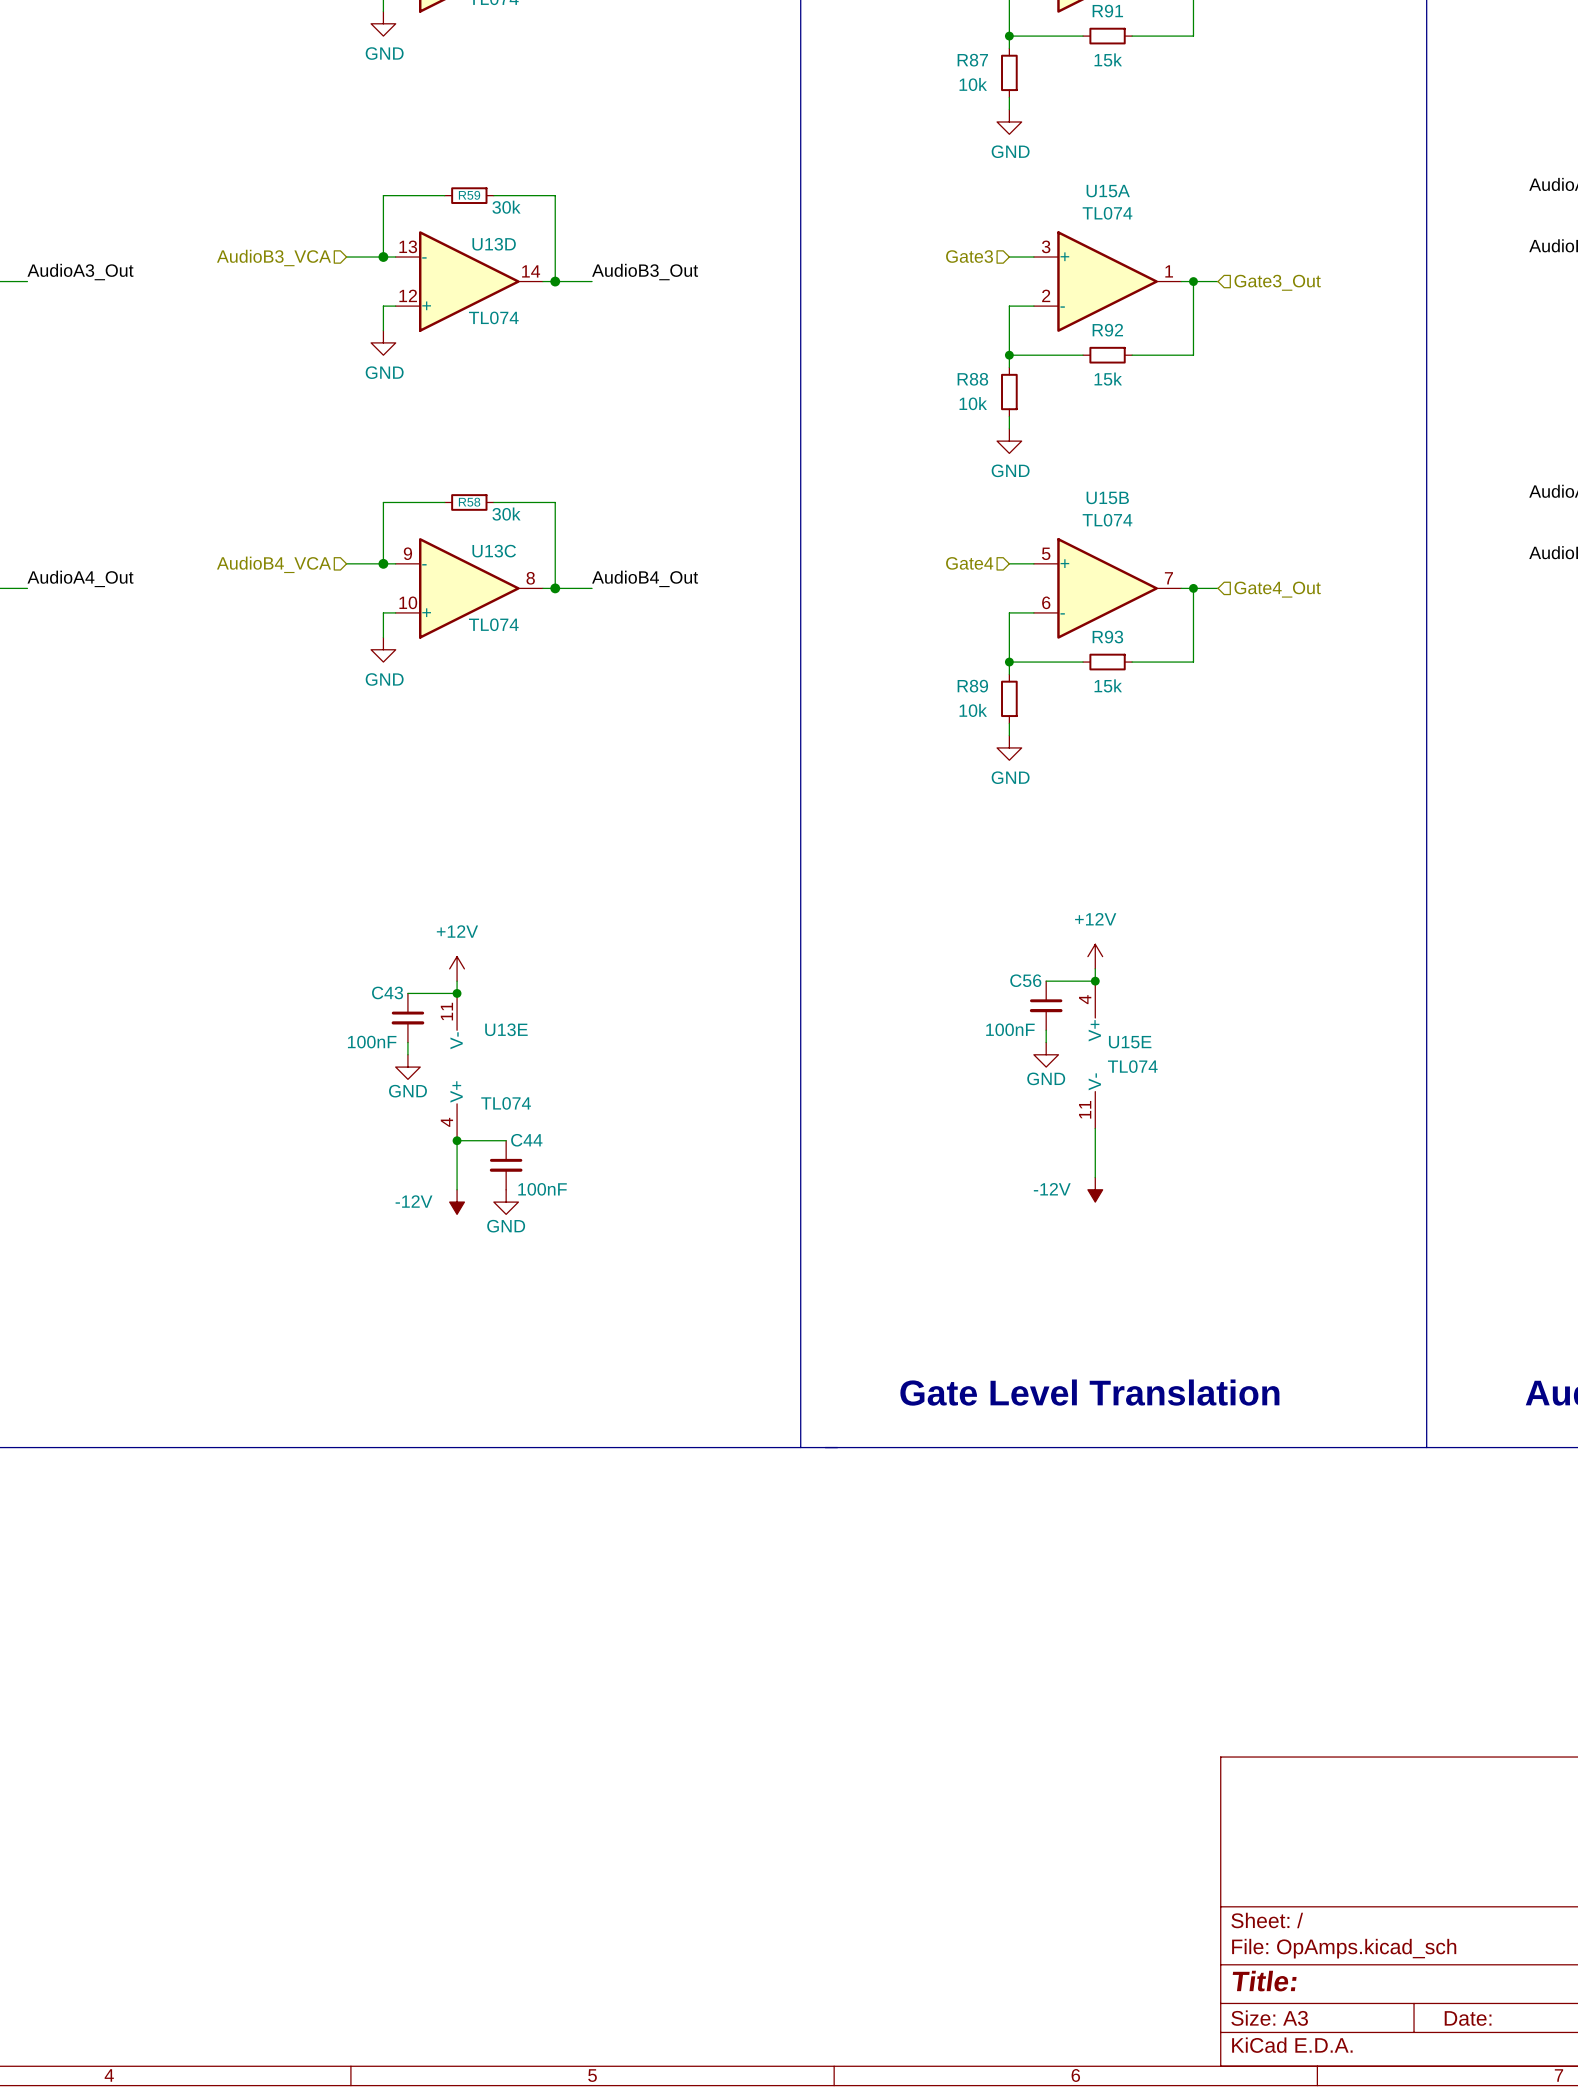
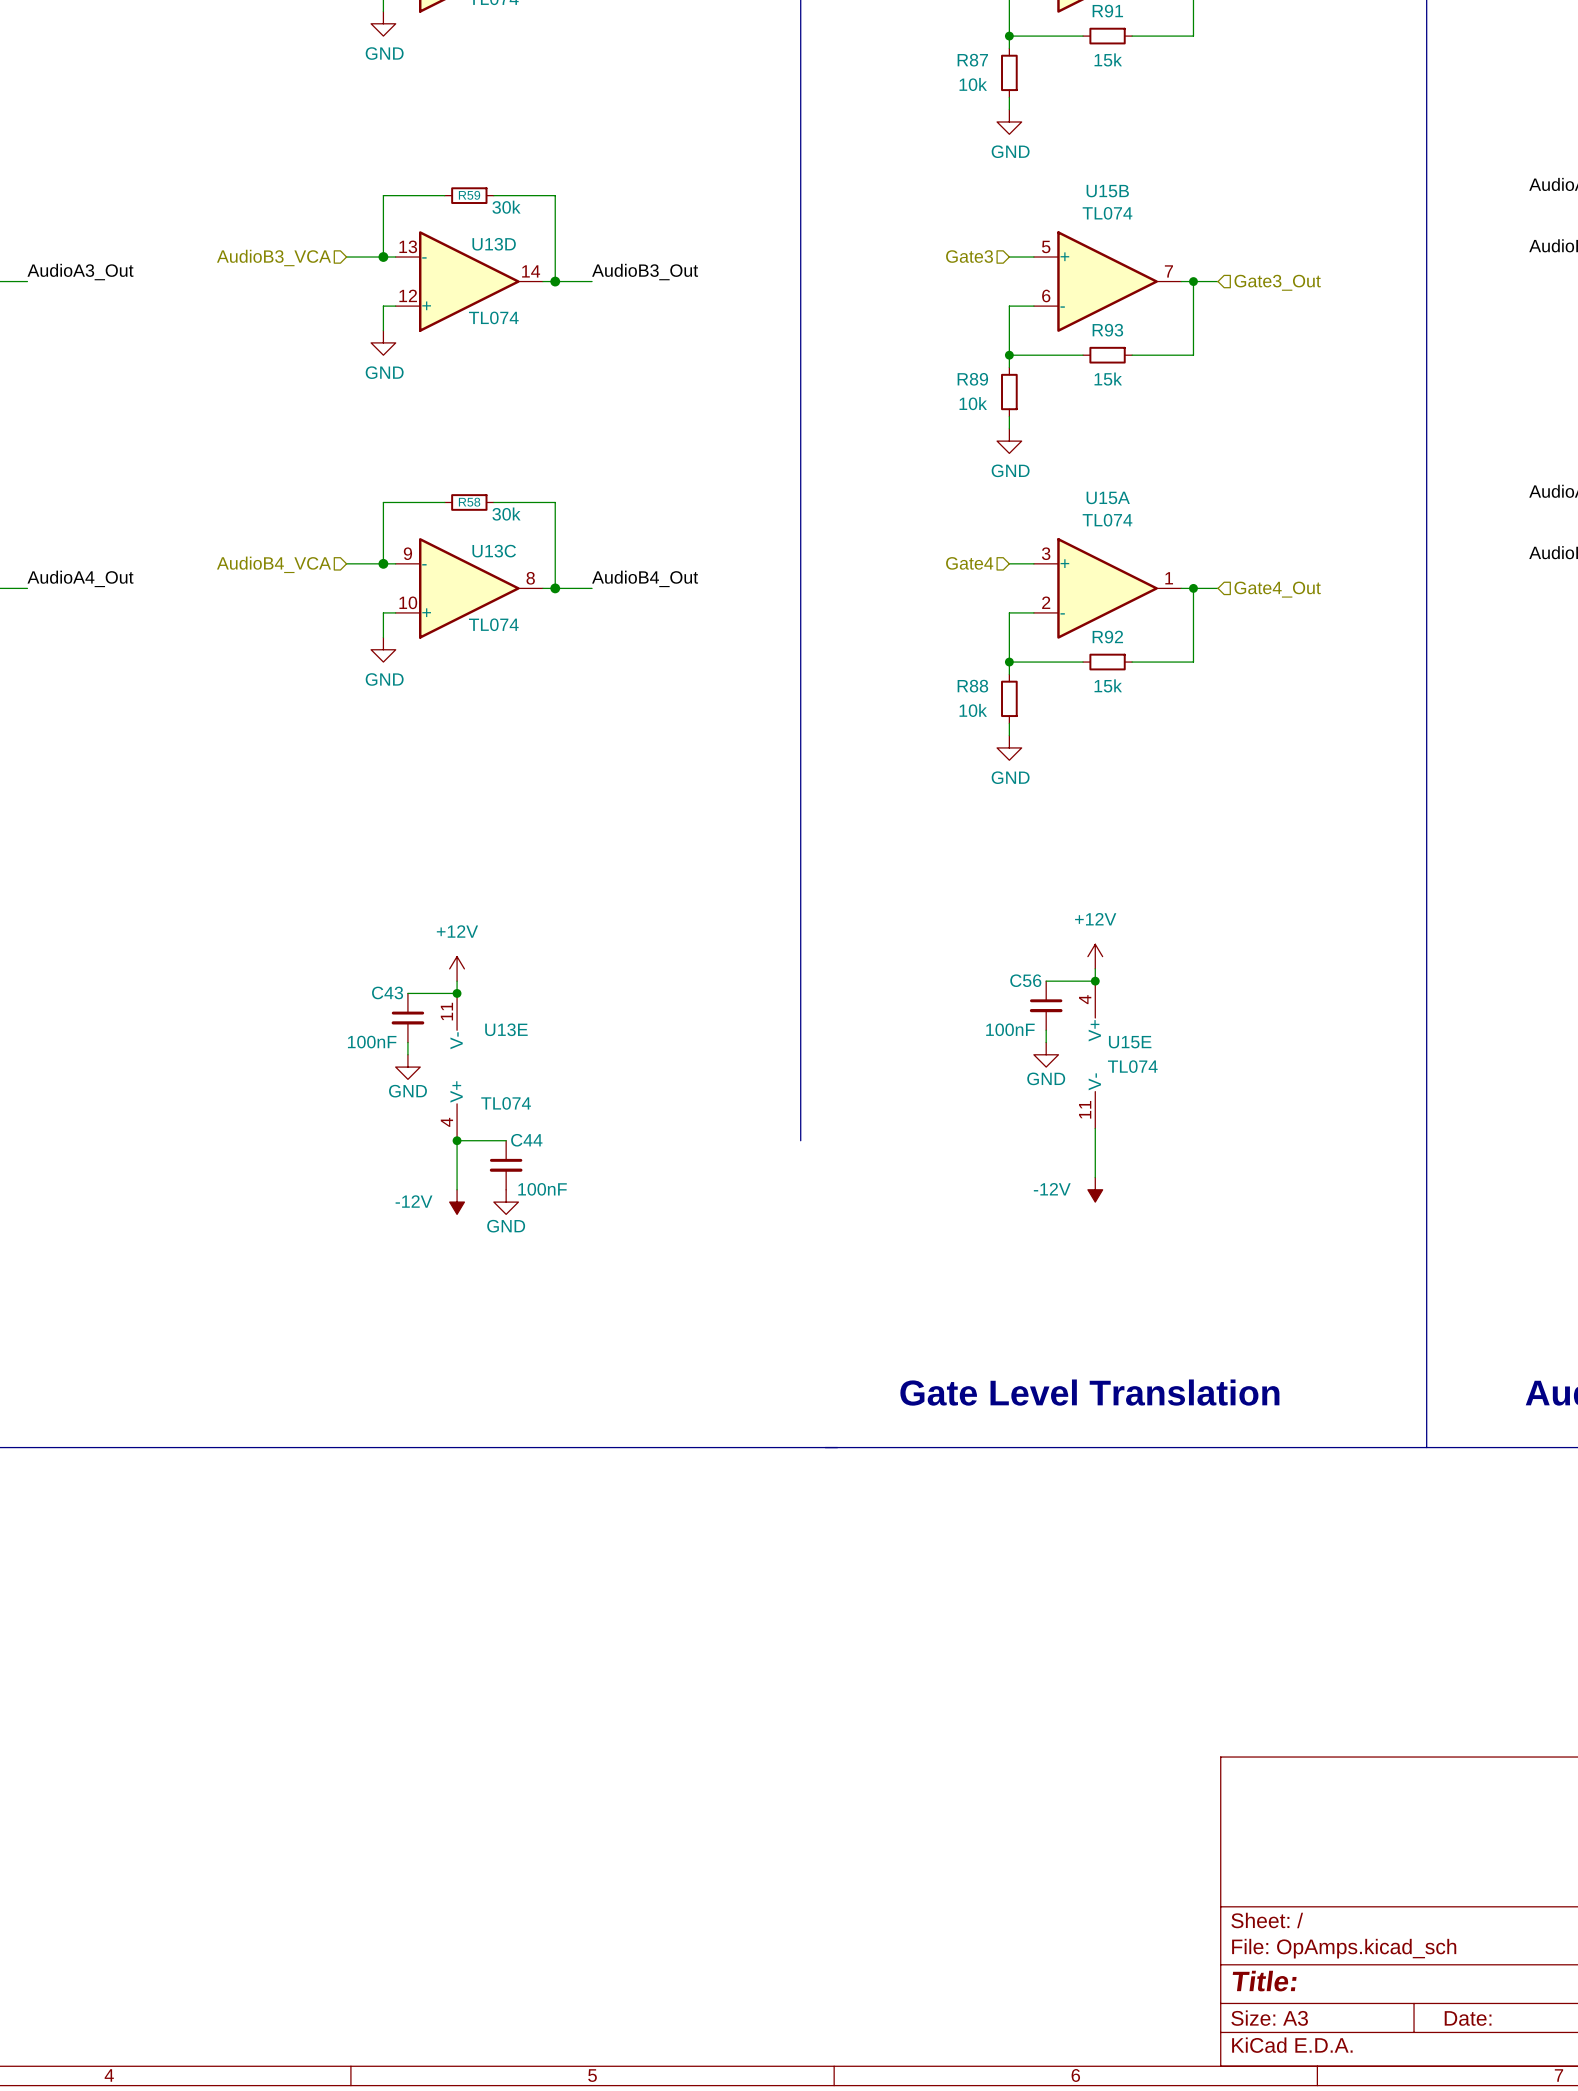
U15A position: (1107, 281) -> (1107, 588)
R92 name: R92 (1107, 330) -> R93 (1107, 330)
R88 name: R88 (972, 379) -> R89 (972, 379)
U15B position: (1107, 588) -> (1107, 281)
R93 name: R93 (1107, 637) -> R92 (1107, 637)
R89 name: R89 (972, 686) -> R88 (972, 686)
line: (800, 1140) (800, 1447) -> none

